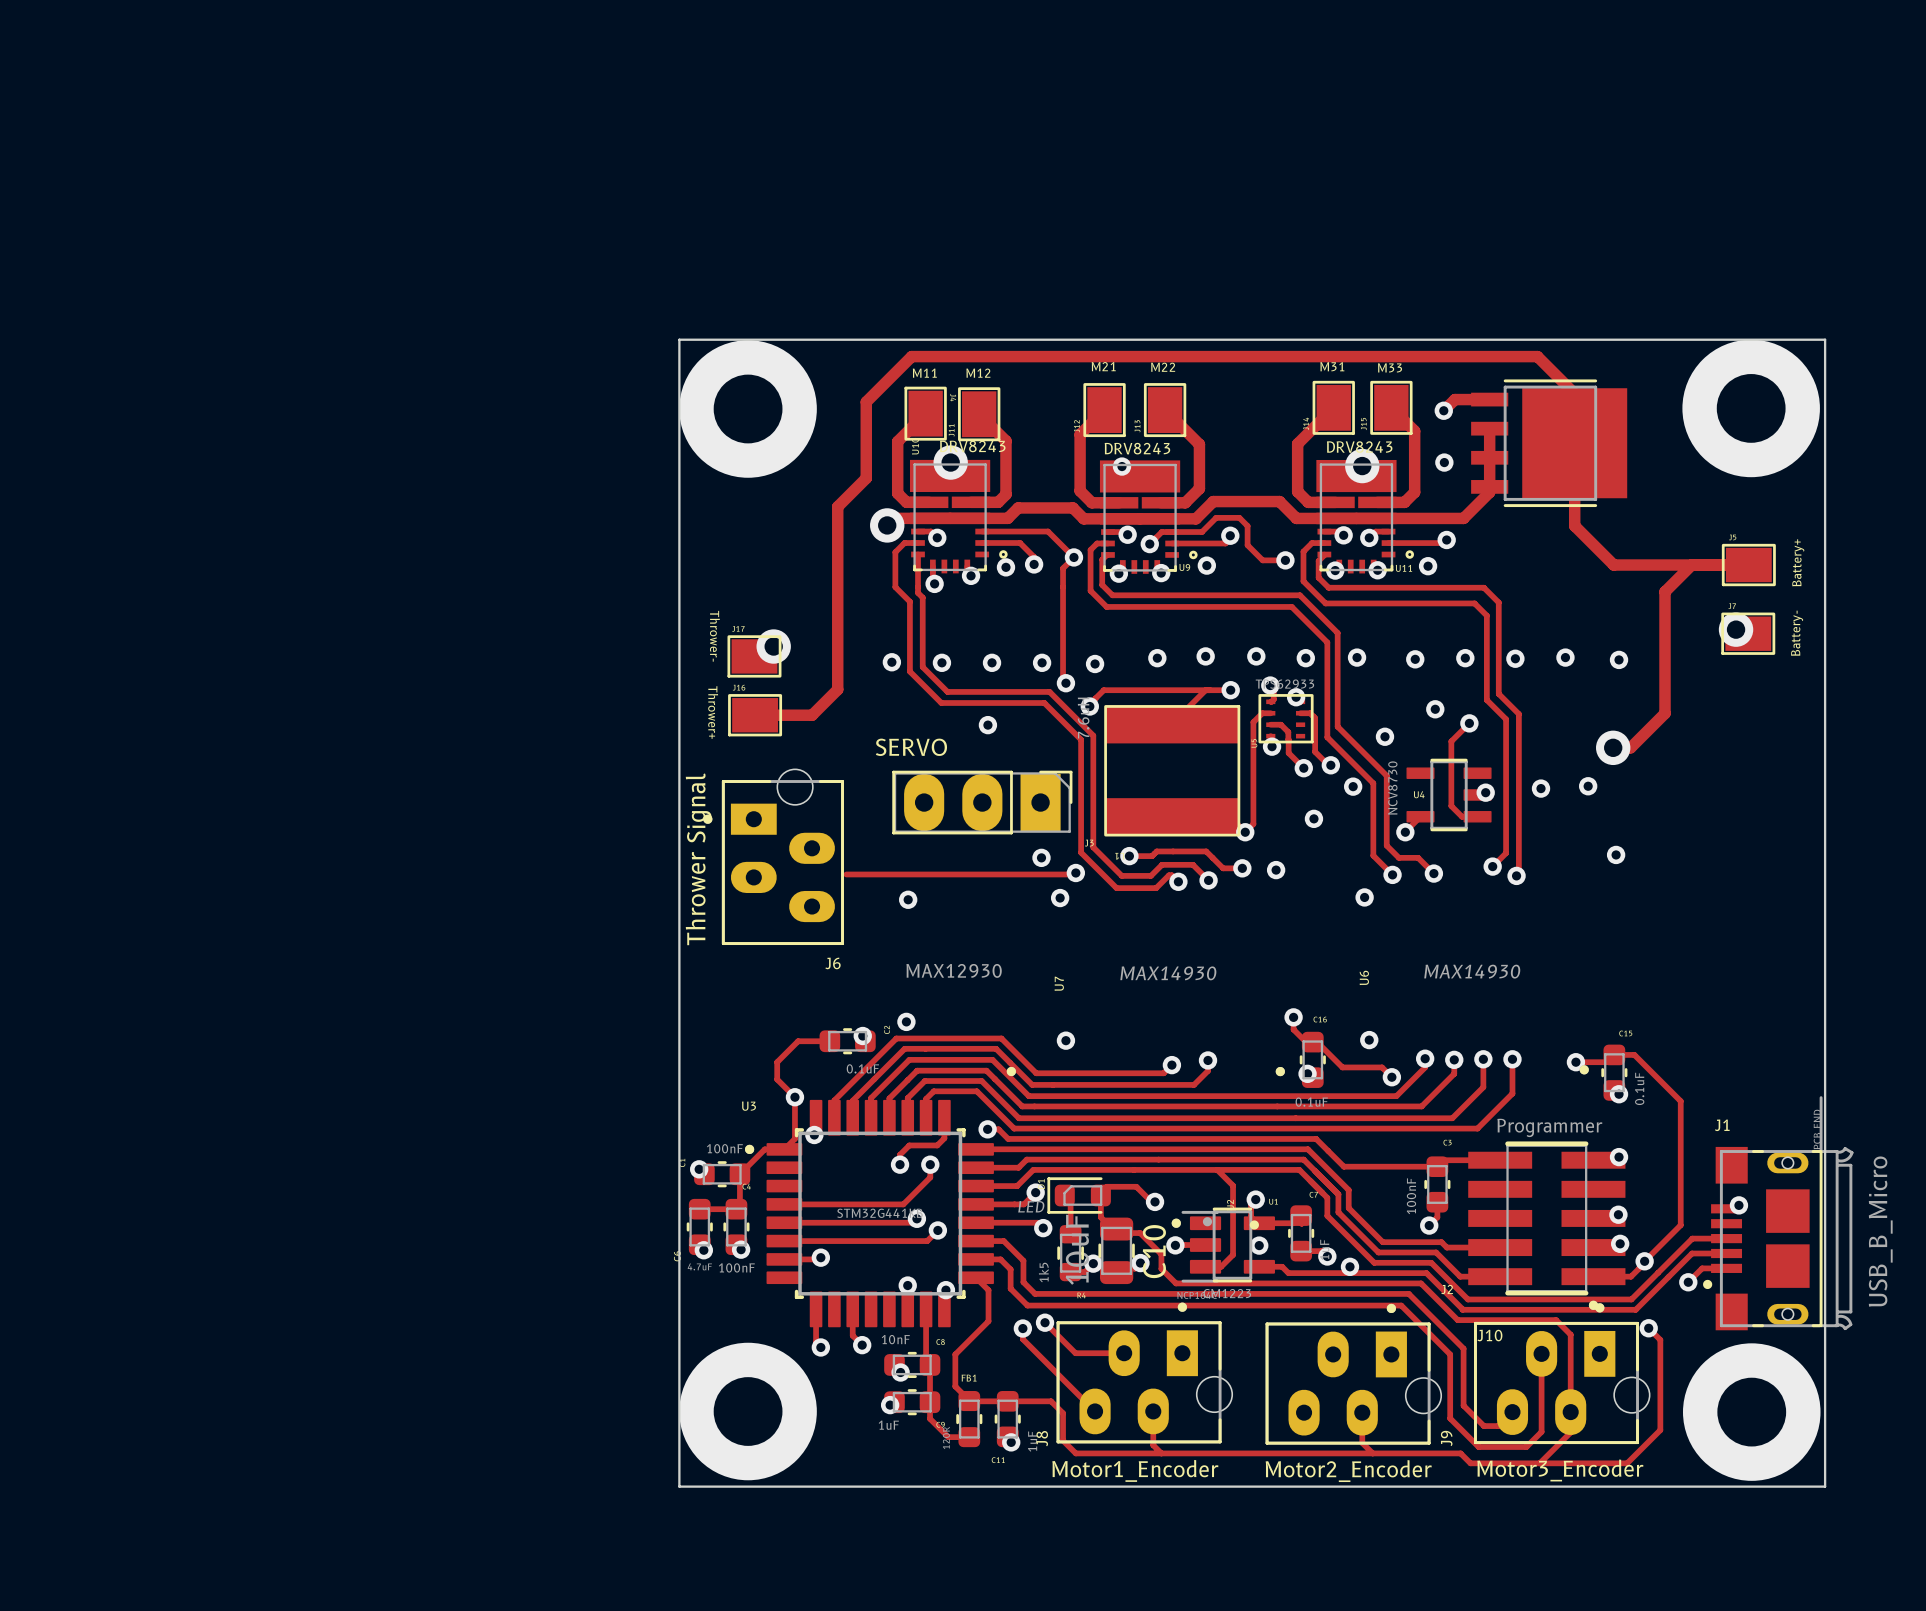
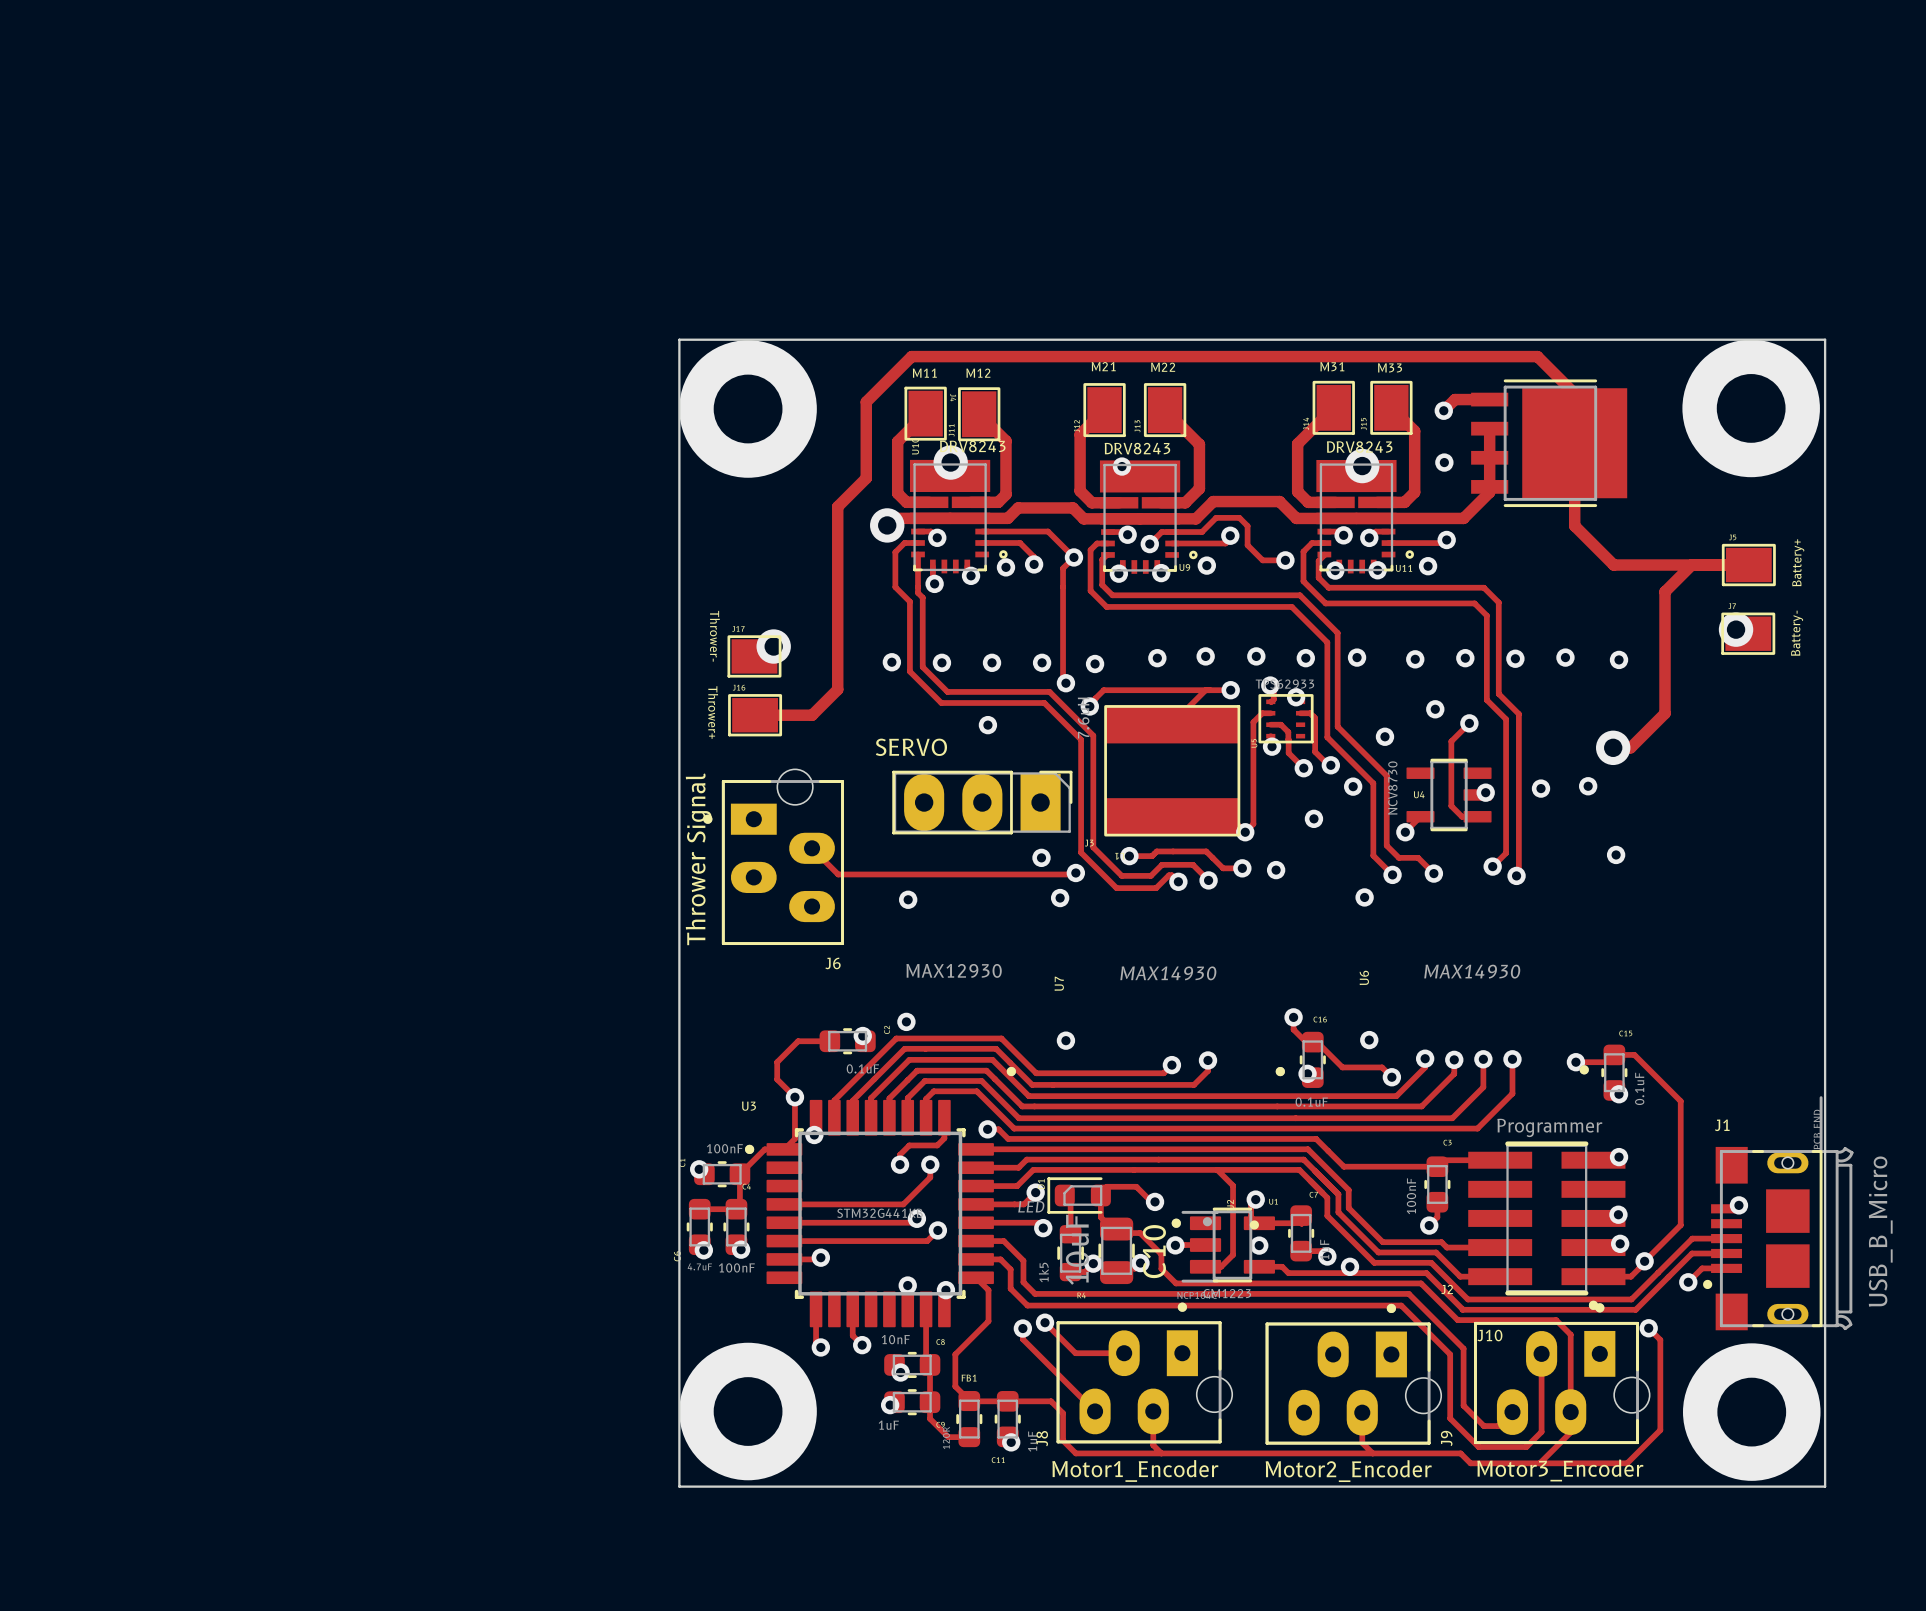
track: none -> (812, 848) (838, 874) (846, 874)

